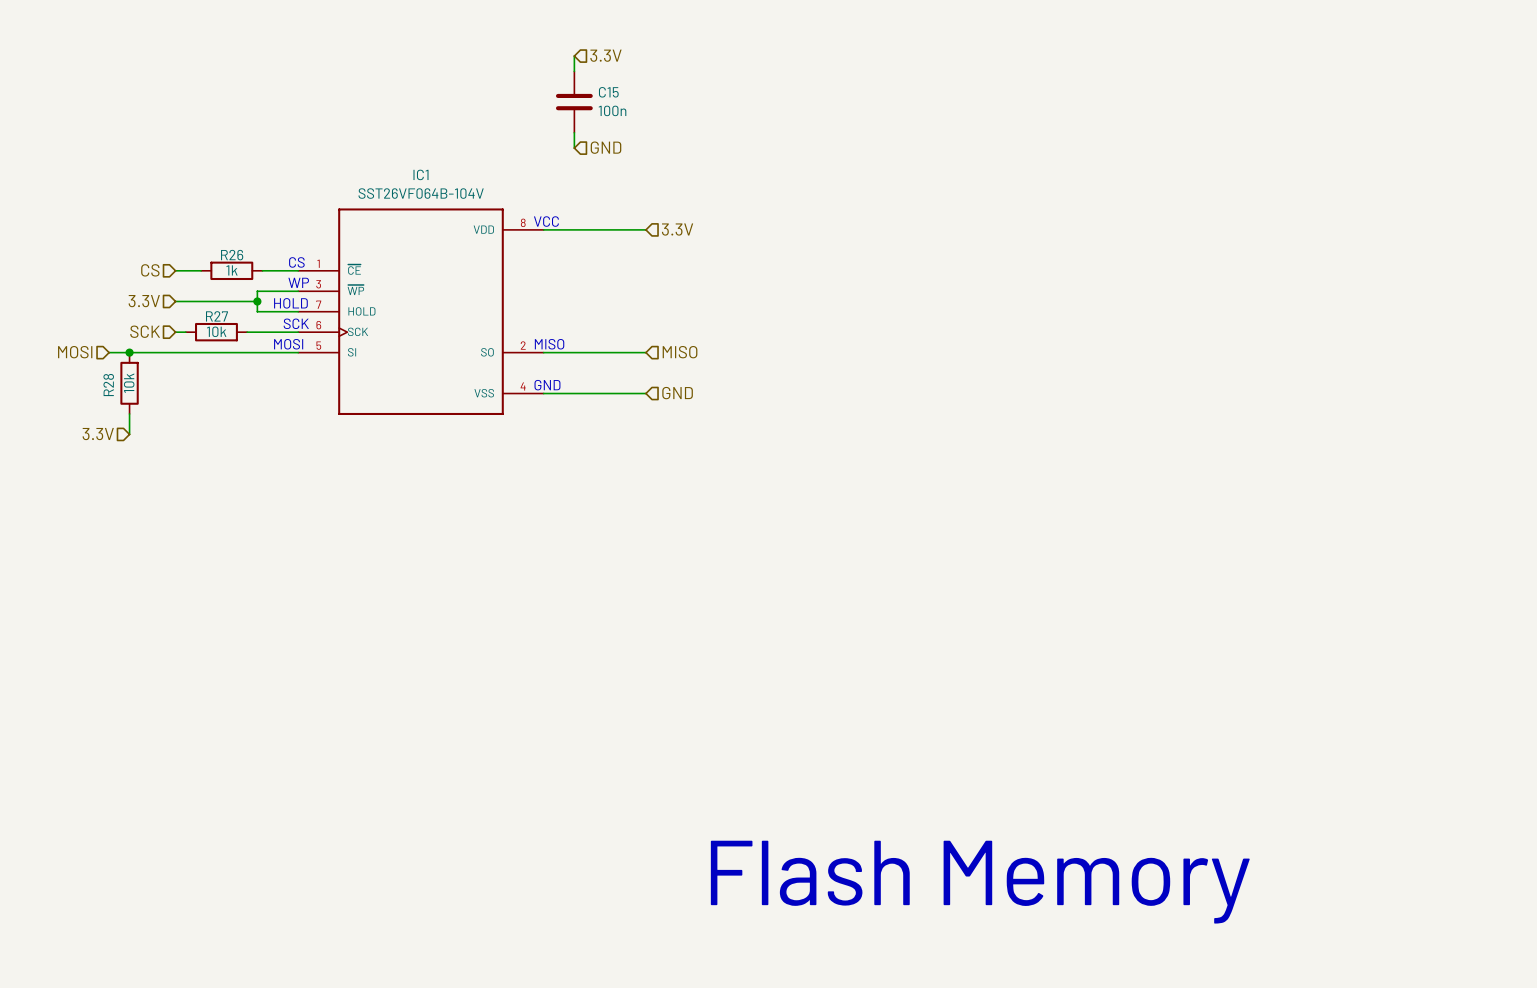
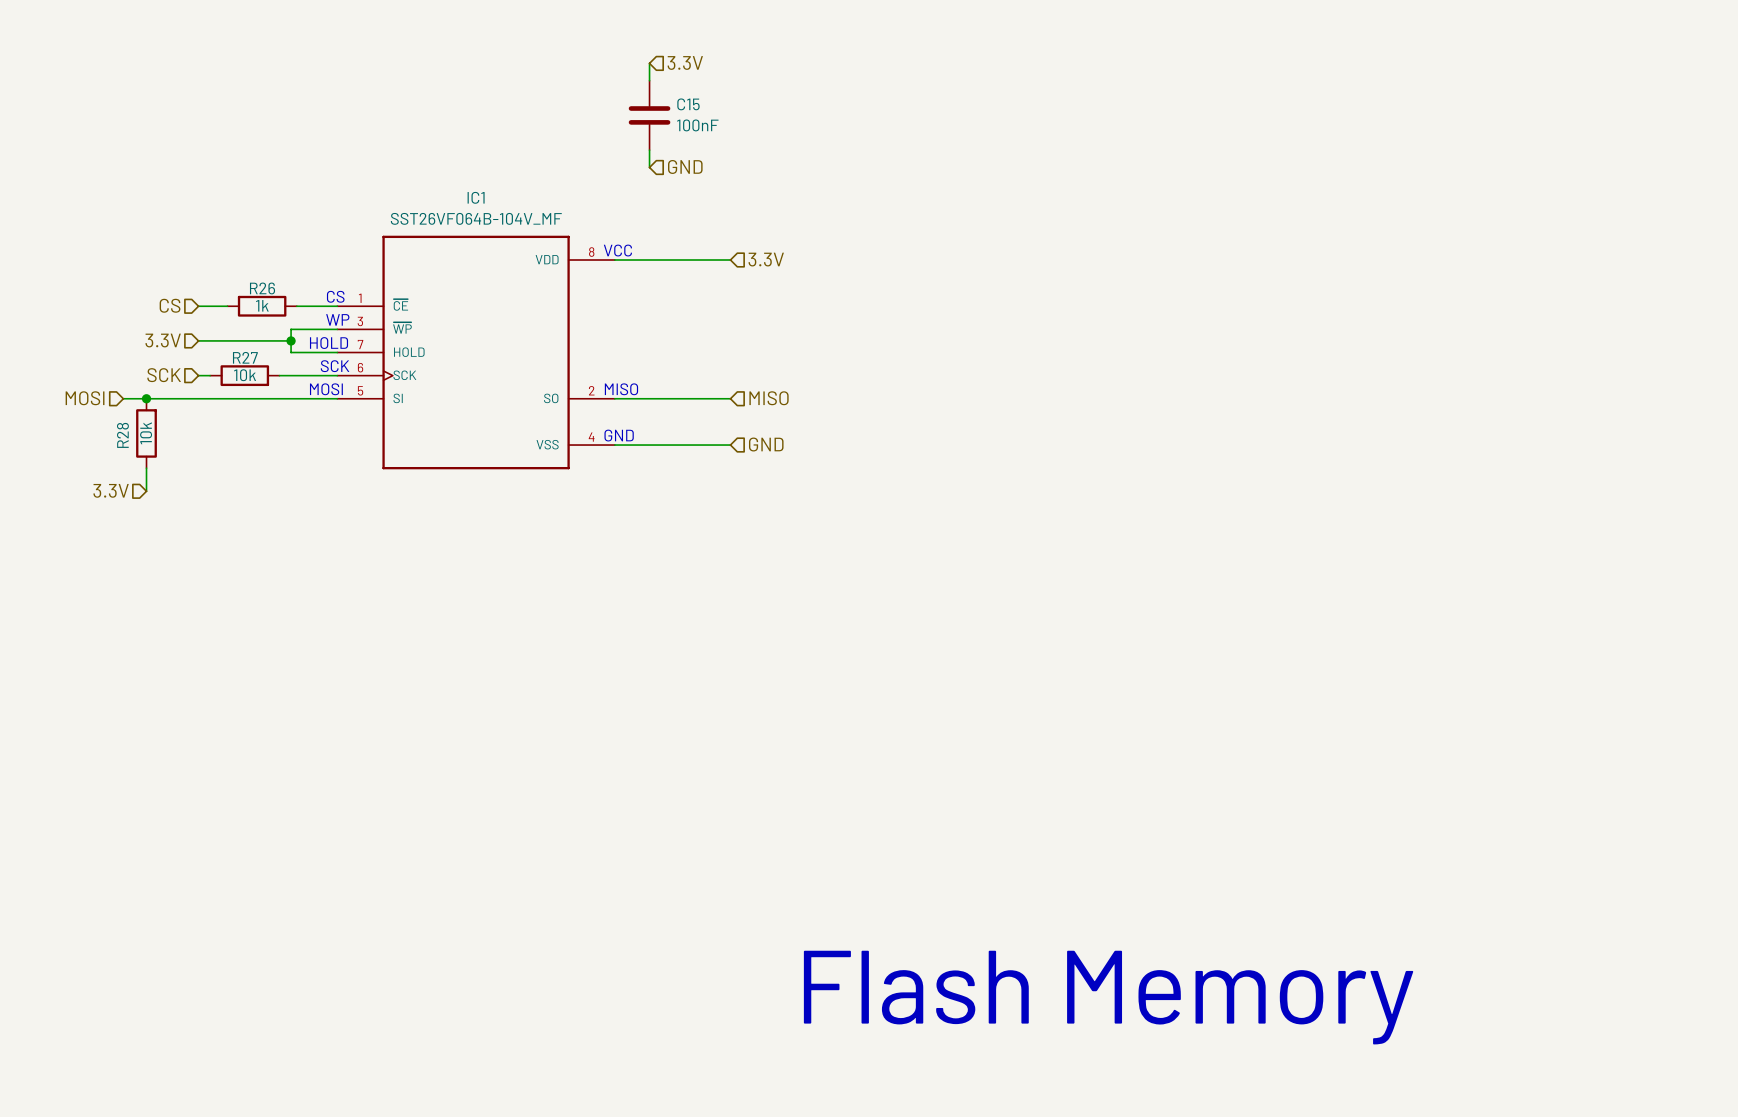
C15 value: 100n (612, 110) -> 100nF (697, 125)
IC1 value: SST26VF064B-104V (421, 193) -> SST26VF064B-104V_MF (476, 218)

